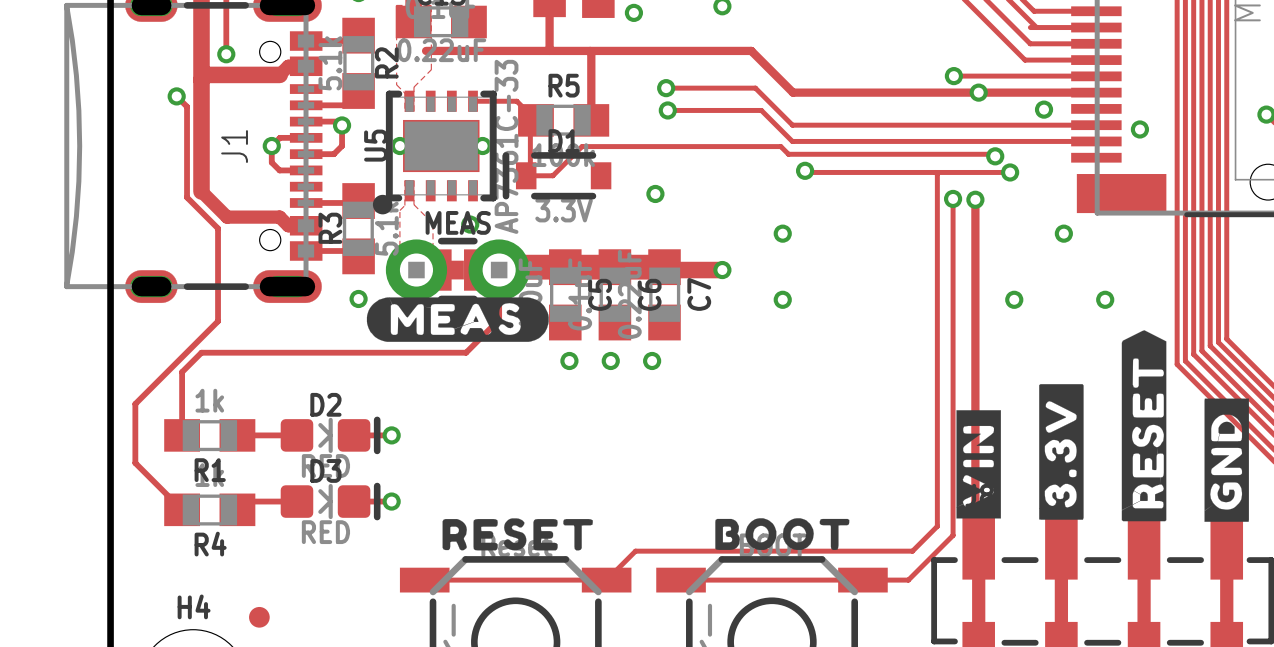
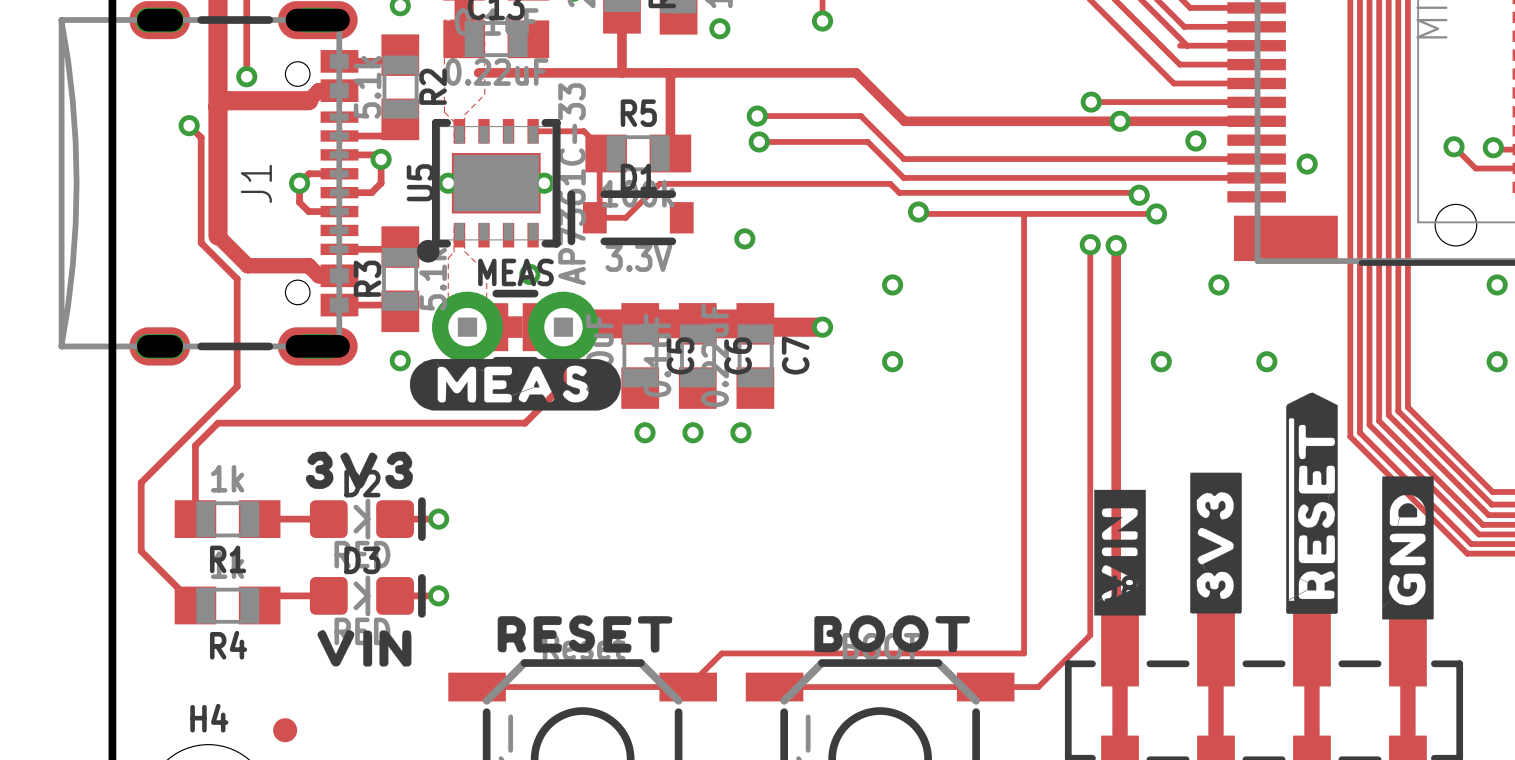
track: (935, 172) (937, 174) (937, 526) (912, 551) (896, 551) -> (1024, 213) (1024, 653)
drawing shape: [1121, 330, 1167, 522] -> [1286, 392, 1338, 614]
drawing: none -> [305, 451, 414, 489]
drawing shape: [1039, 384, 1084, 520] -> [1190, 472, 1242, 614]
drawing: none -> [317, 630, 412, 667]

